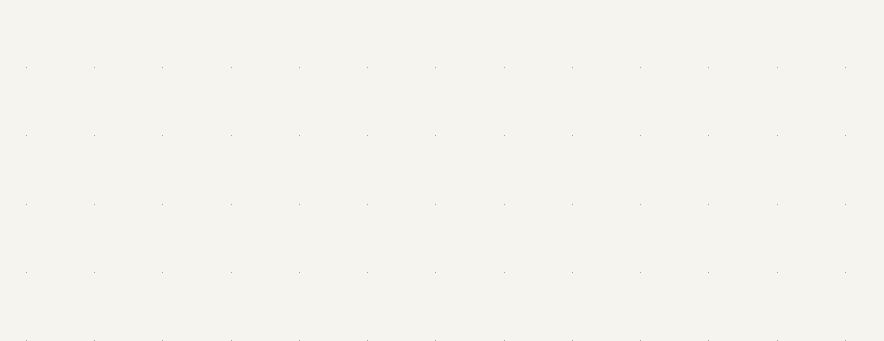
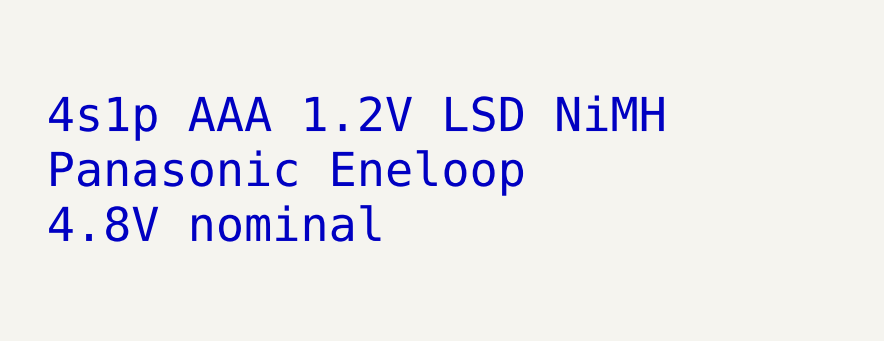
text: none -> 4s1p AAA 1.2V LSD NiMH (356, 118)
text: none -> Panasonic Eneloop (287, 172)
text: none -> 4.8V nominal (214, 223)

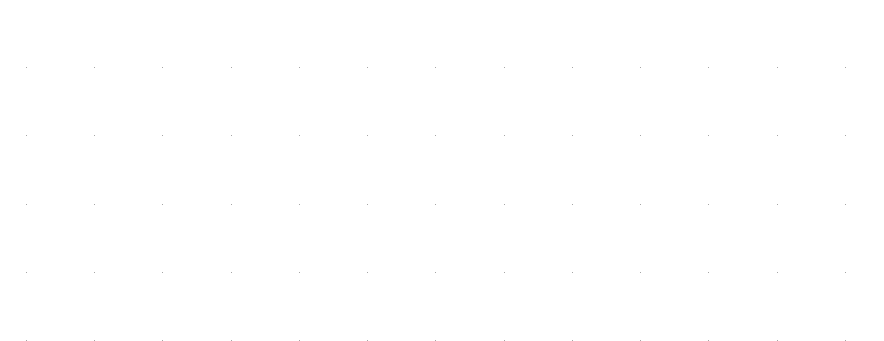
text: 4s1p AAA 1.2V LSD NiMH (356, 118) -> none
text: Panasonic Eneloop (287, 172) -> none
text: 4.8V nominal (214, 223) -> none

